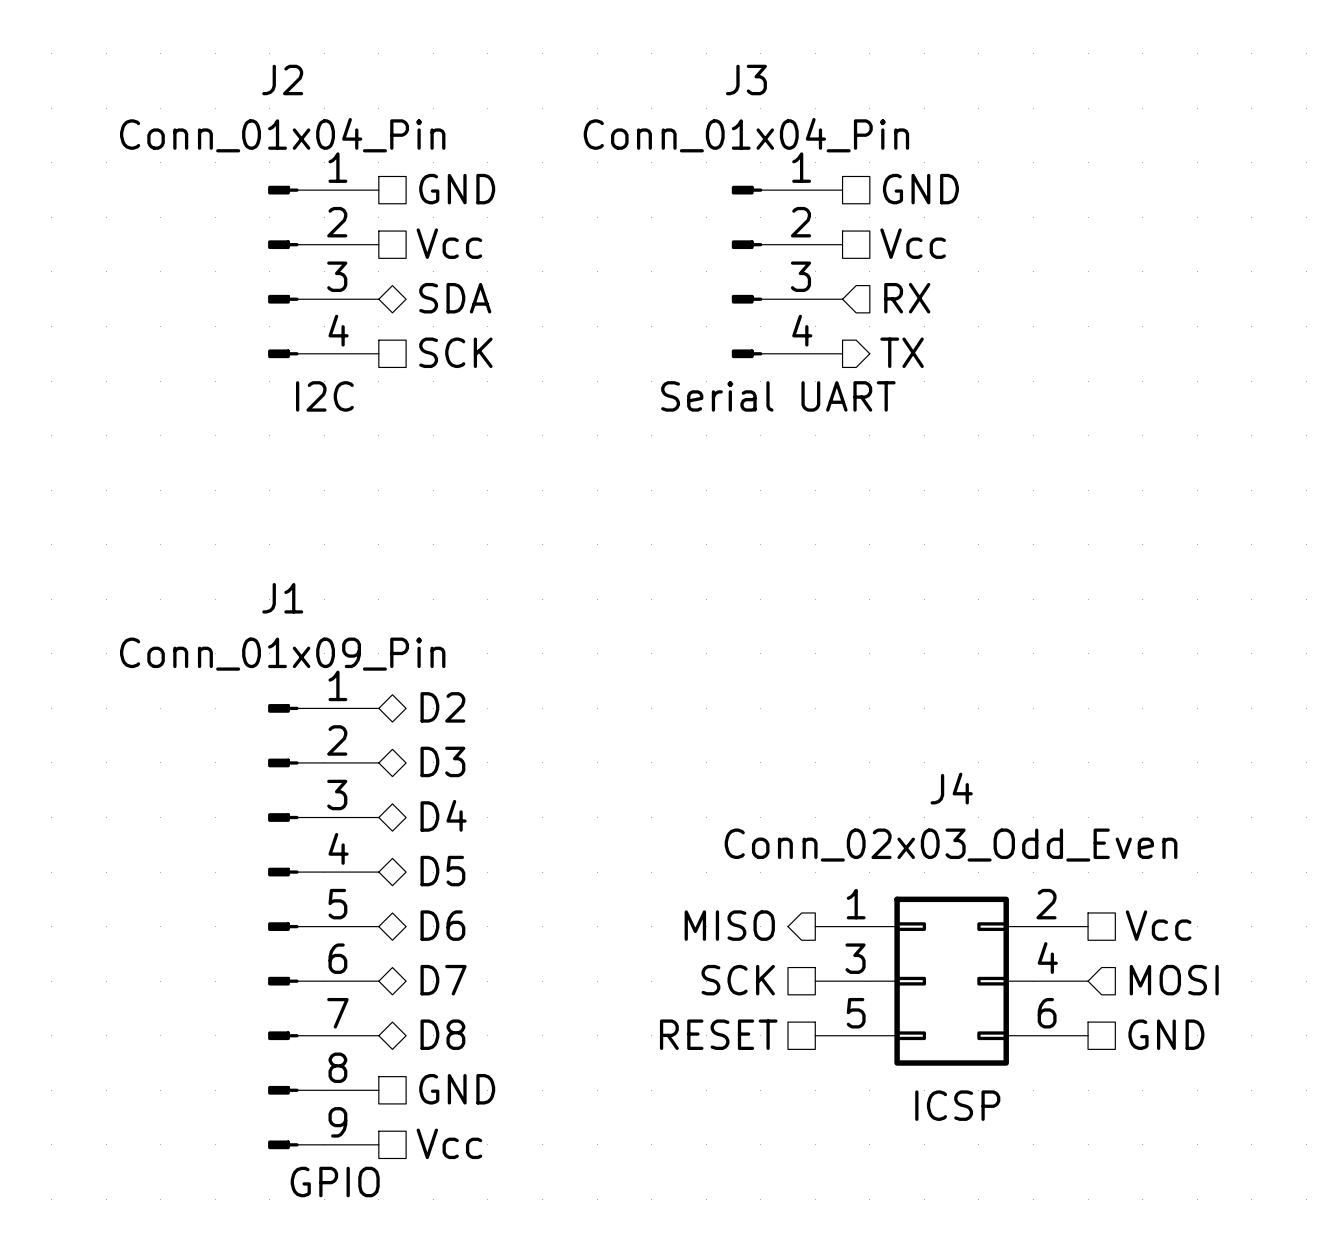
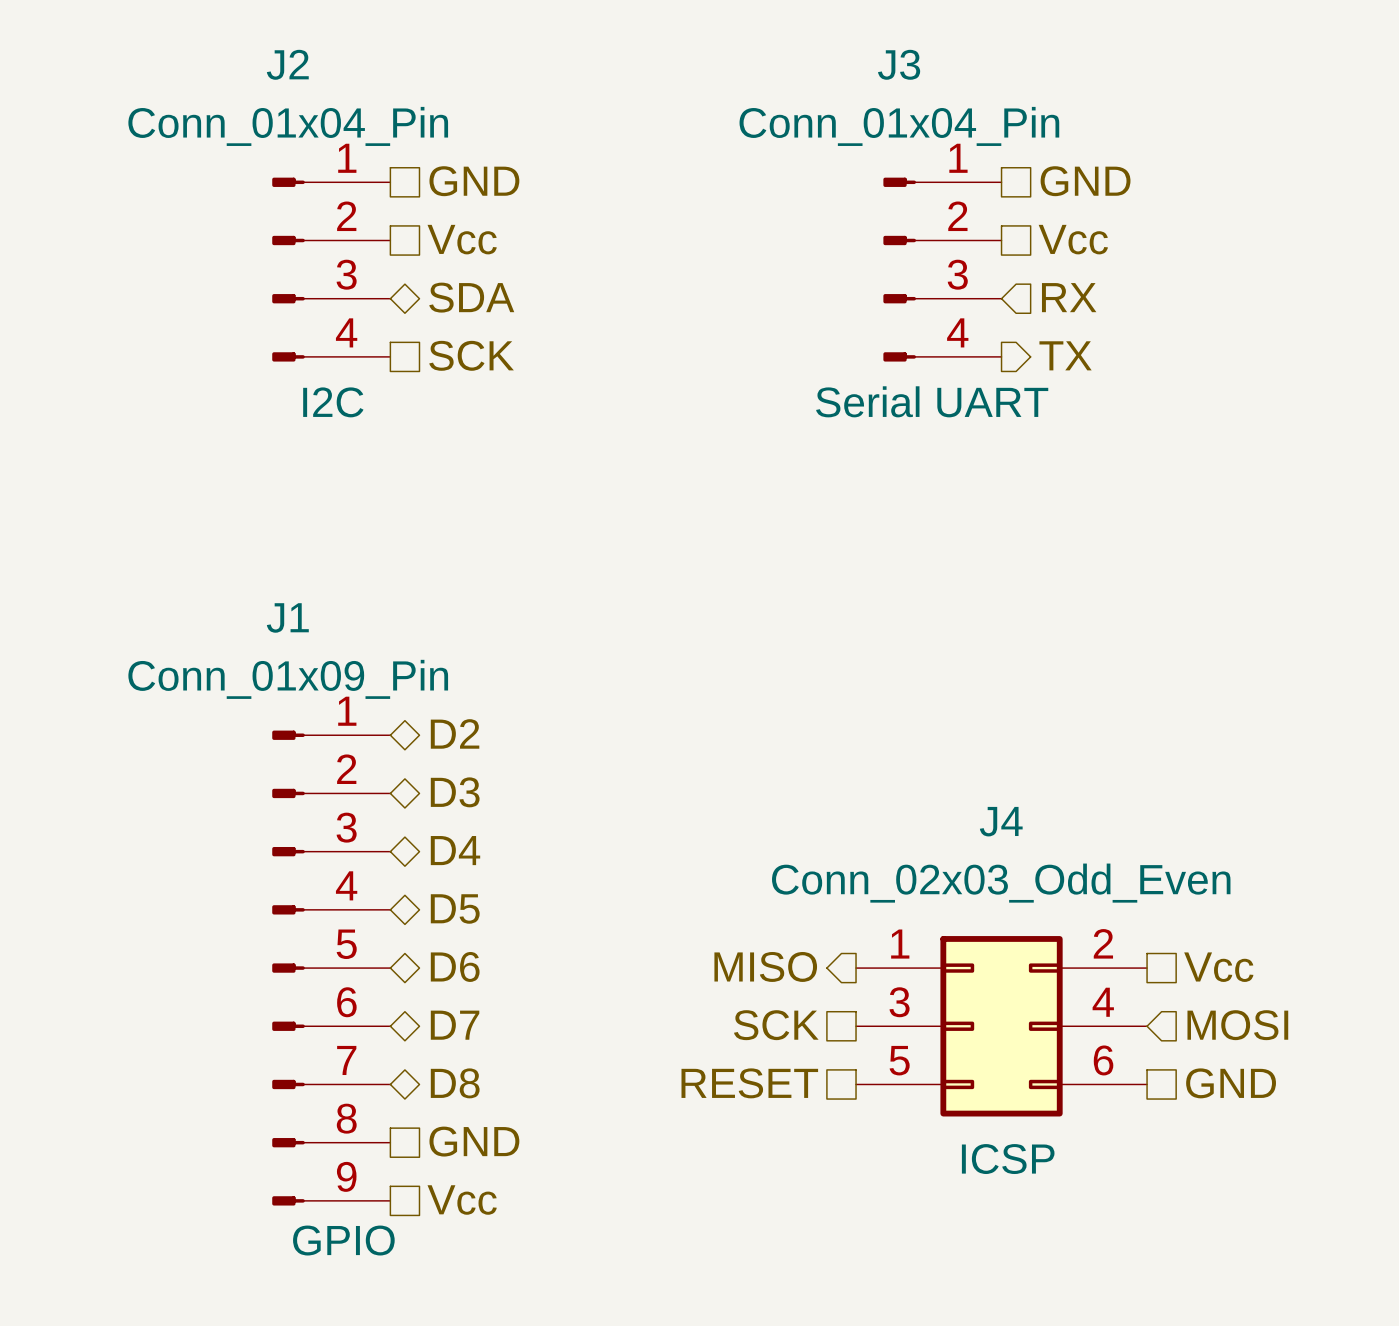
hierarchical label position: GND (920, 189) -> GND (1085, 181)
hierarchical label position: Vcc (913, 243) -> Vcc (1073, 239)
J3 position: (787, 271) -> (942, 269)
hierarchical label position: RX (907, 298) -> RX (1069, 297)
hierarchical label position: TX (902, 352) -> TX (1065, 355)

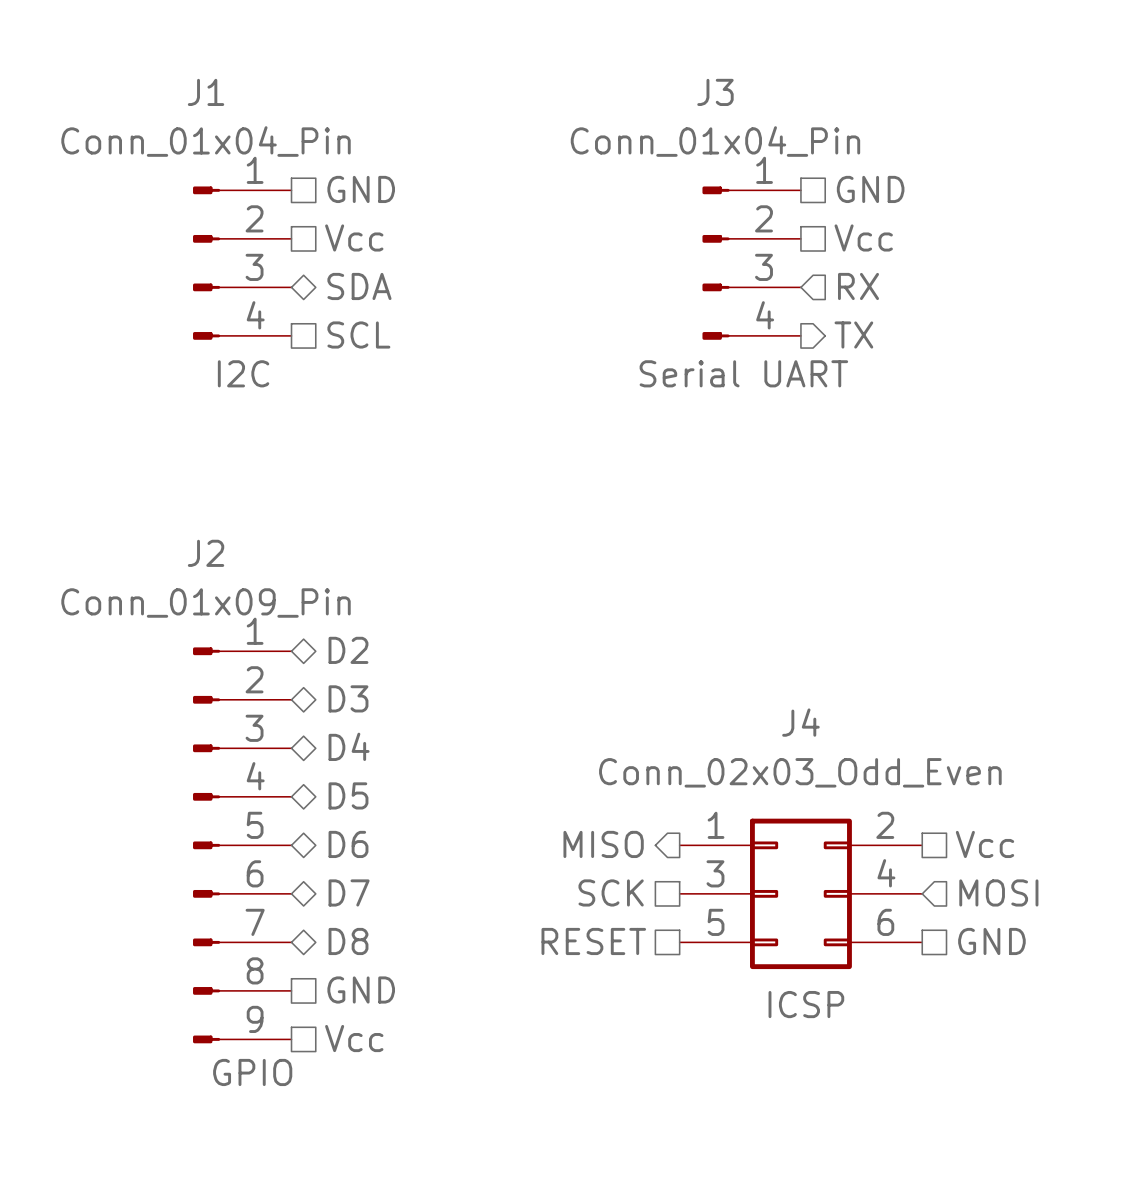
J2 name: J2 (287, 64) -> J1 (206, 92)
hierarchical label: SCK (471, 355) -> SCL (358, 335)
J1 name: J1 (287, 617) -> J2 (206, 553)

